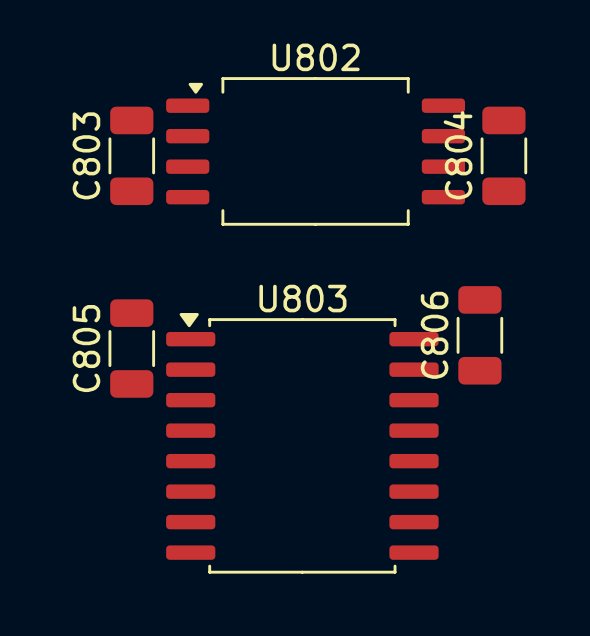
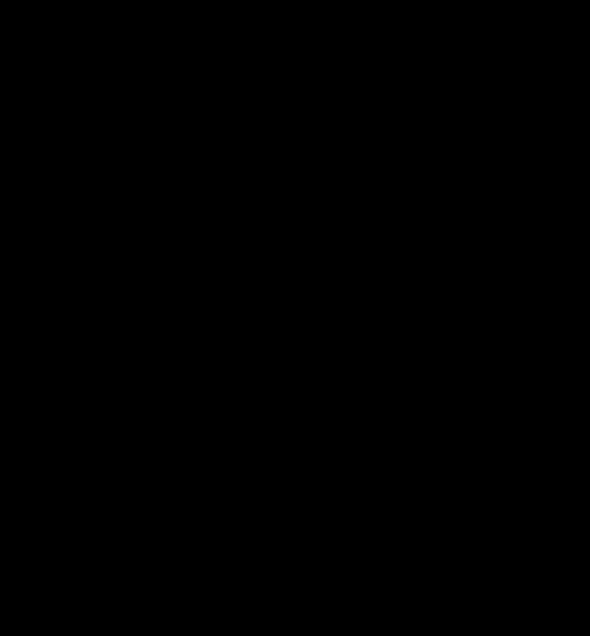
U802: (315, 151) -> none
C803: (131, 155) -> none
C804: (503, 155) -> none
C806: (479, 335) -> none
C805: (131, 348) -> none
U803: (302, 443) -> none

